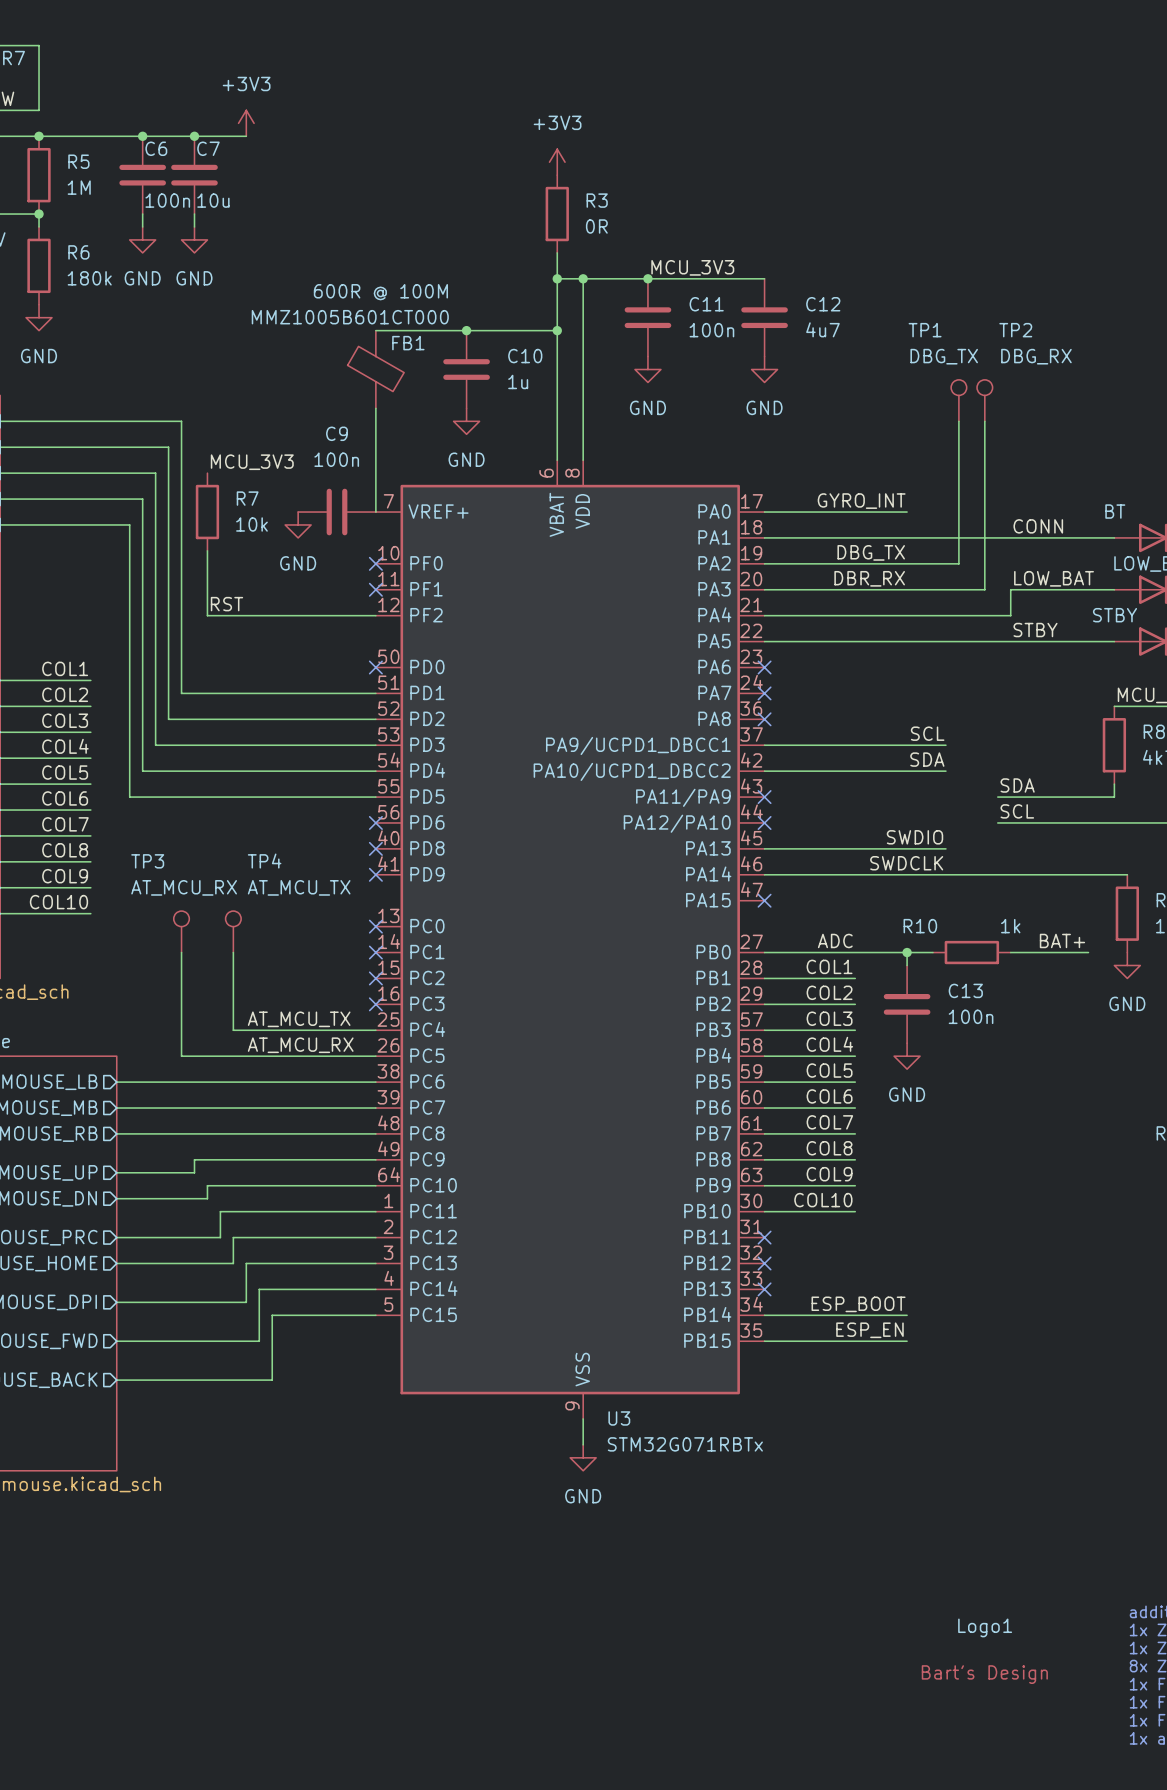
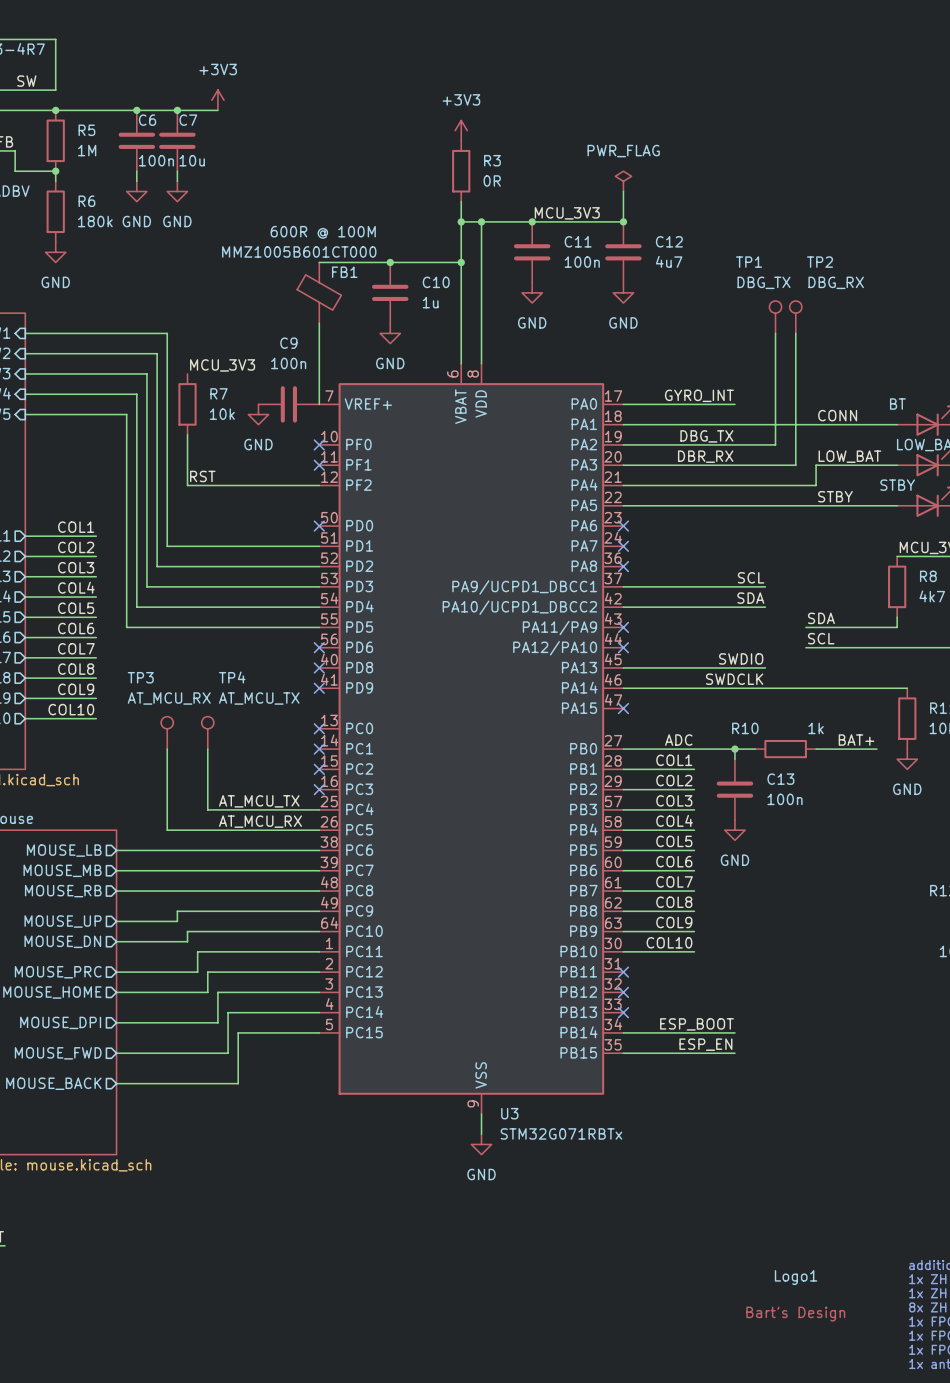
power symbol: none -> PWR_FLAG (623, 181)
wire: none -> (623, 191) (623, 221)
junction: none -> (623, 221)

